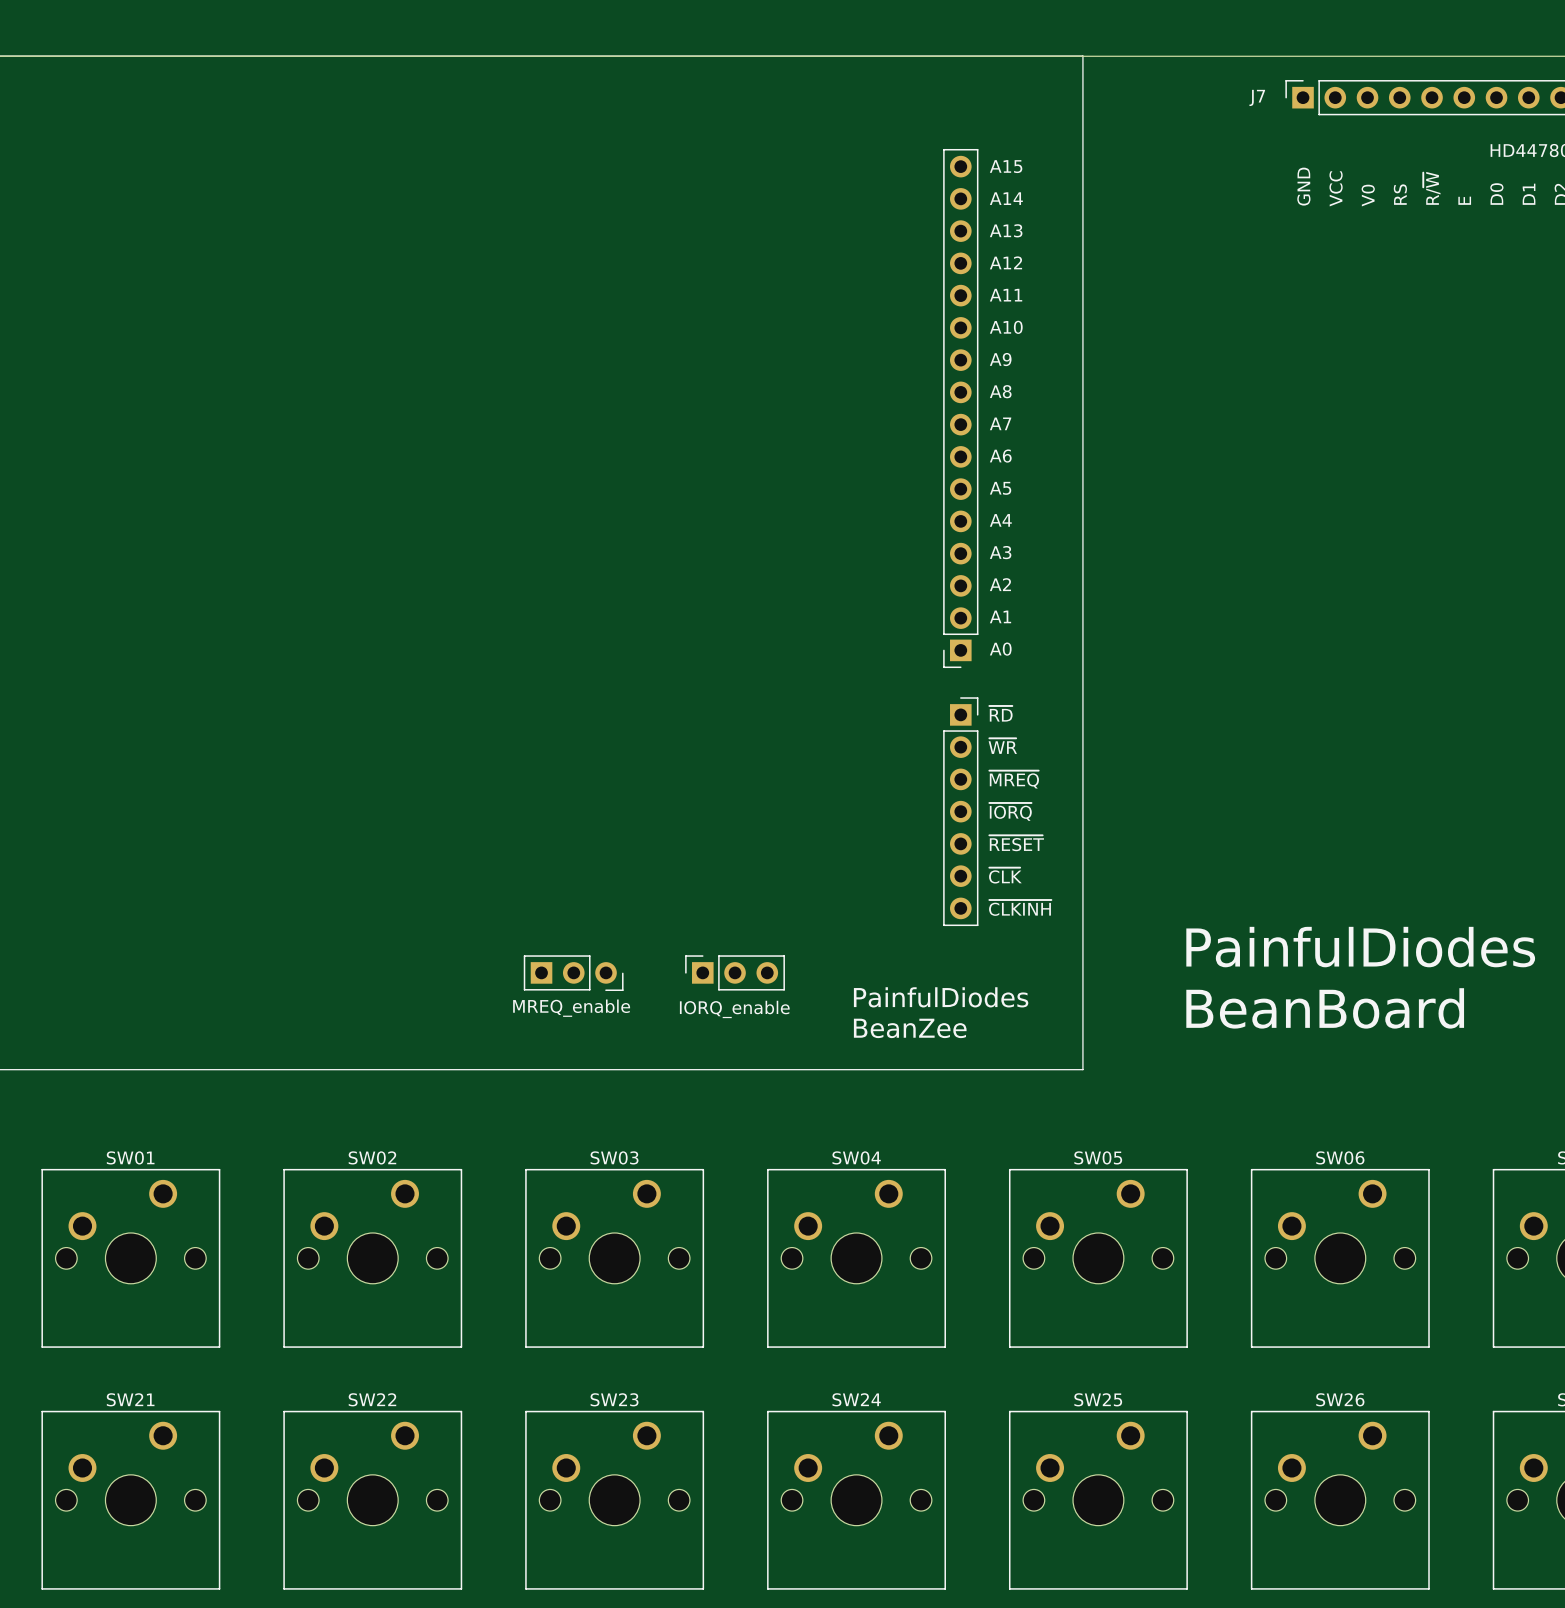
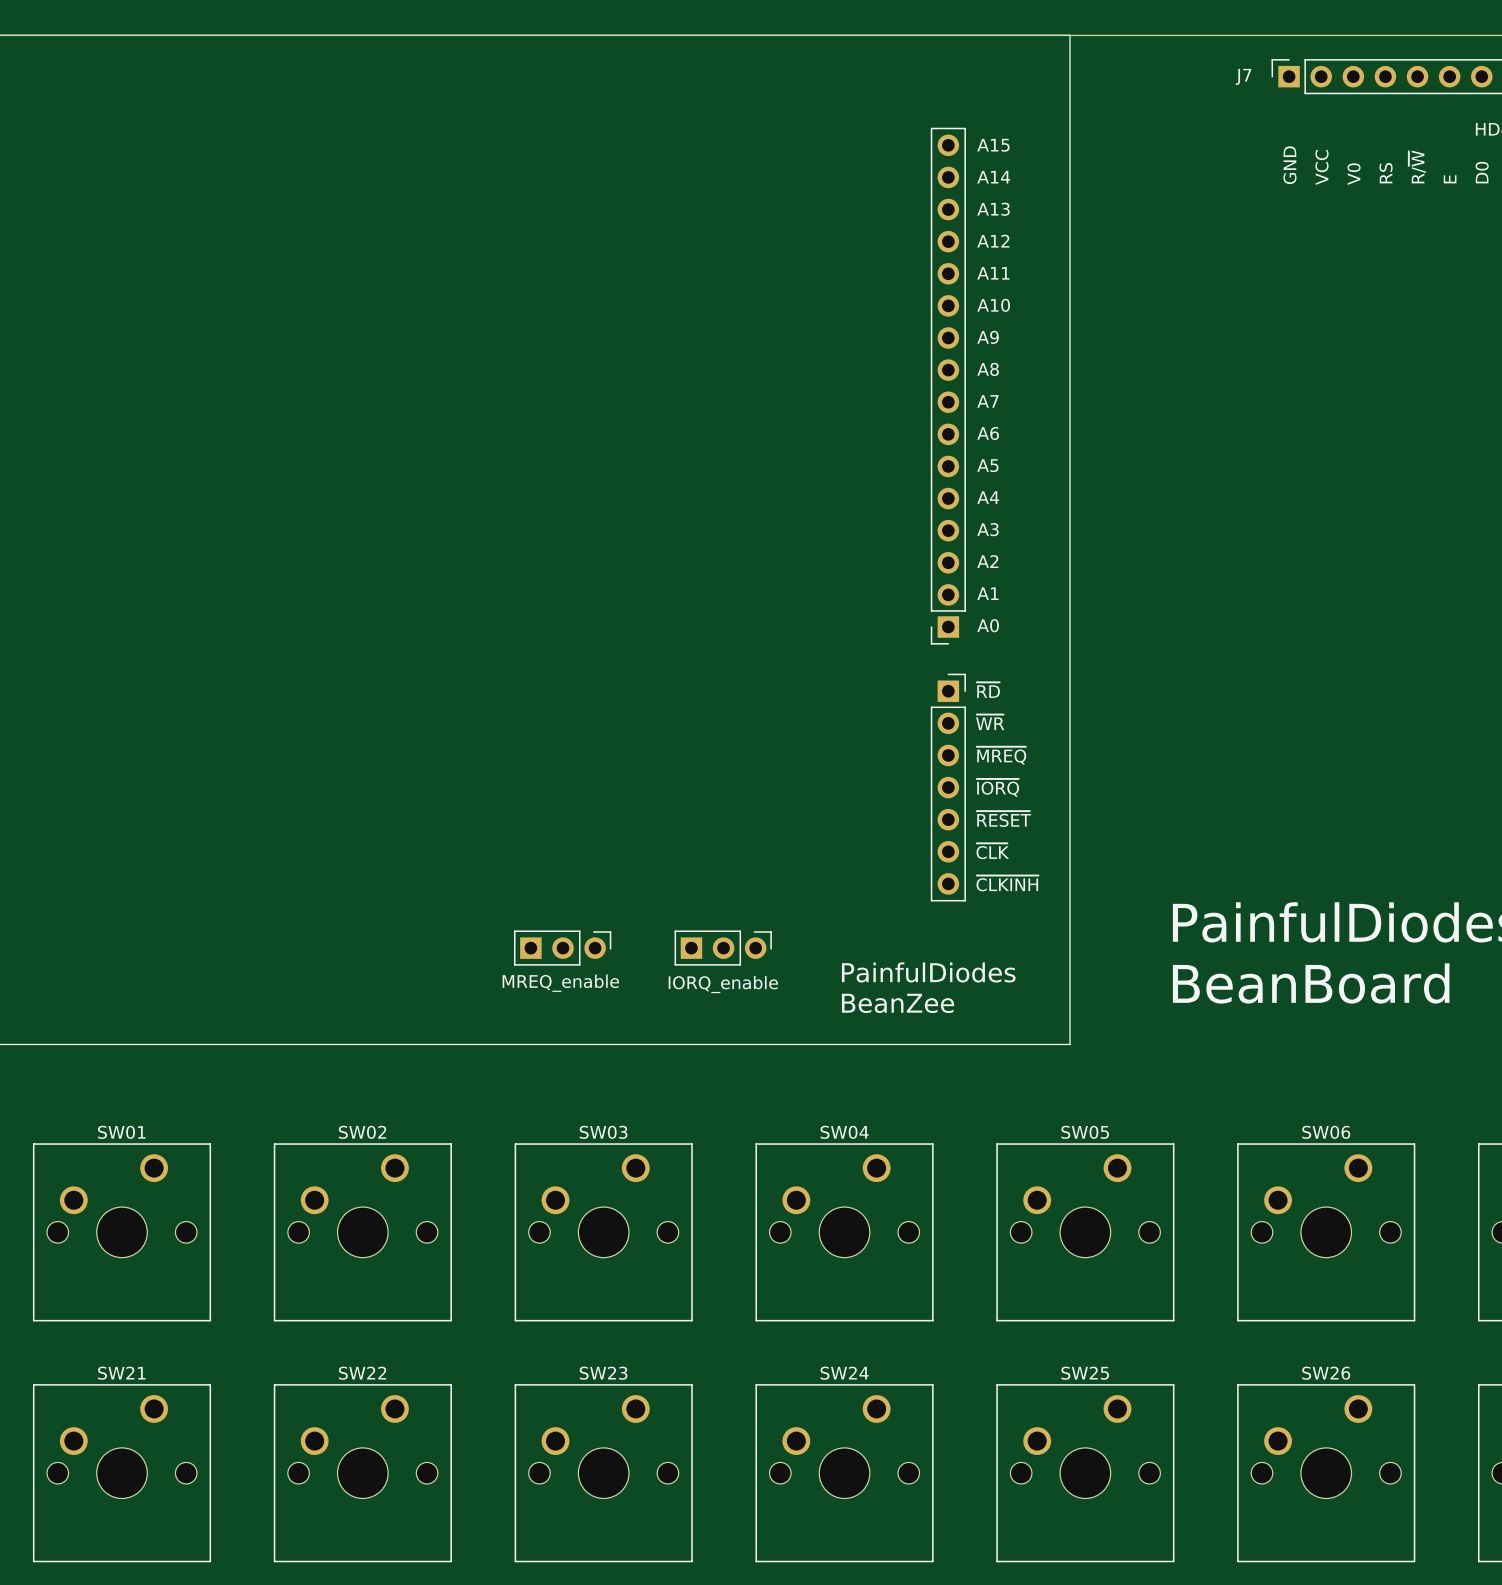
part footprint: [523, 955, 624, 992] -> [513, 930, 612, 966]
part footprint: [685, 955, 785, 991] -> [674, 930, 772, 966]

